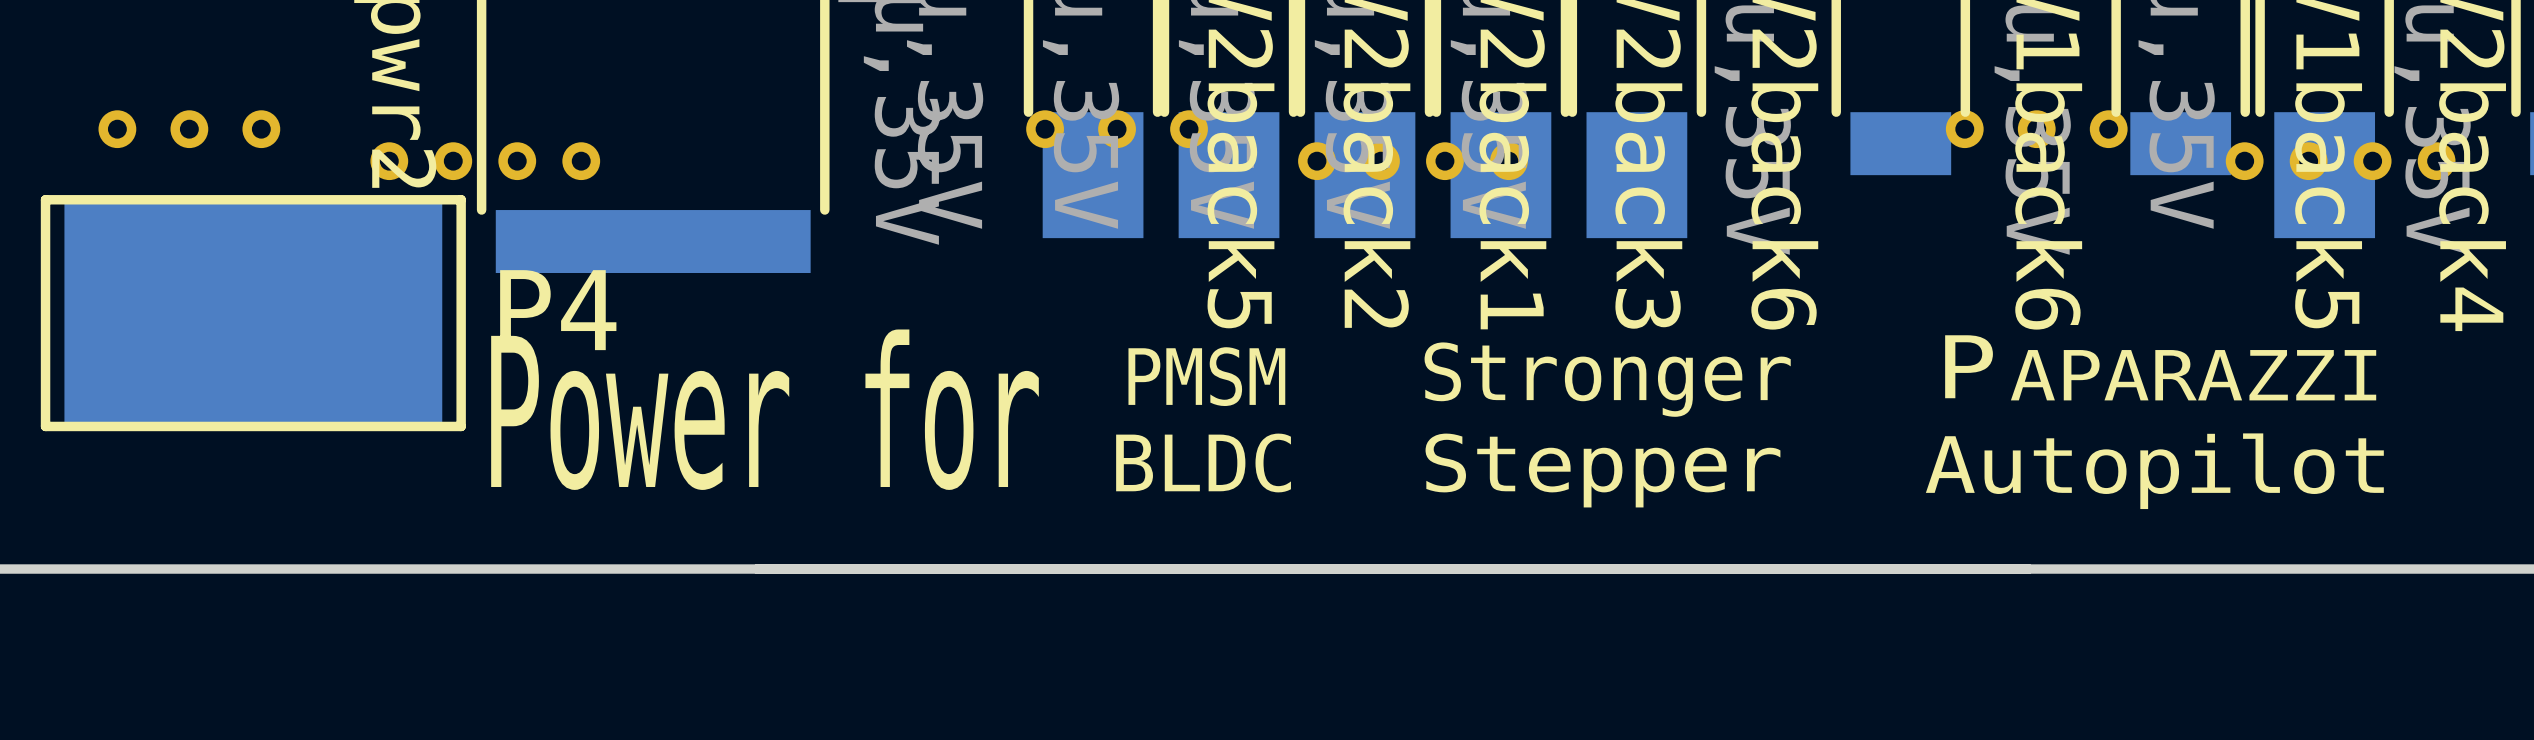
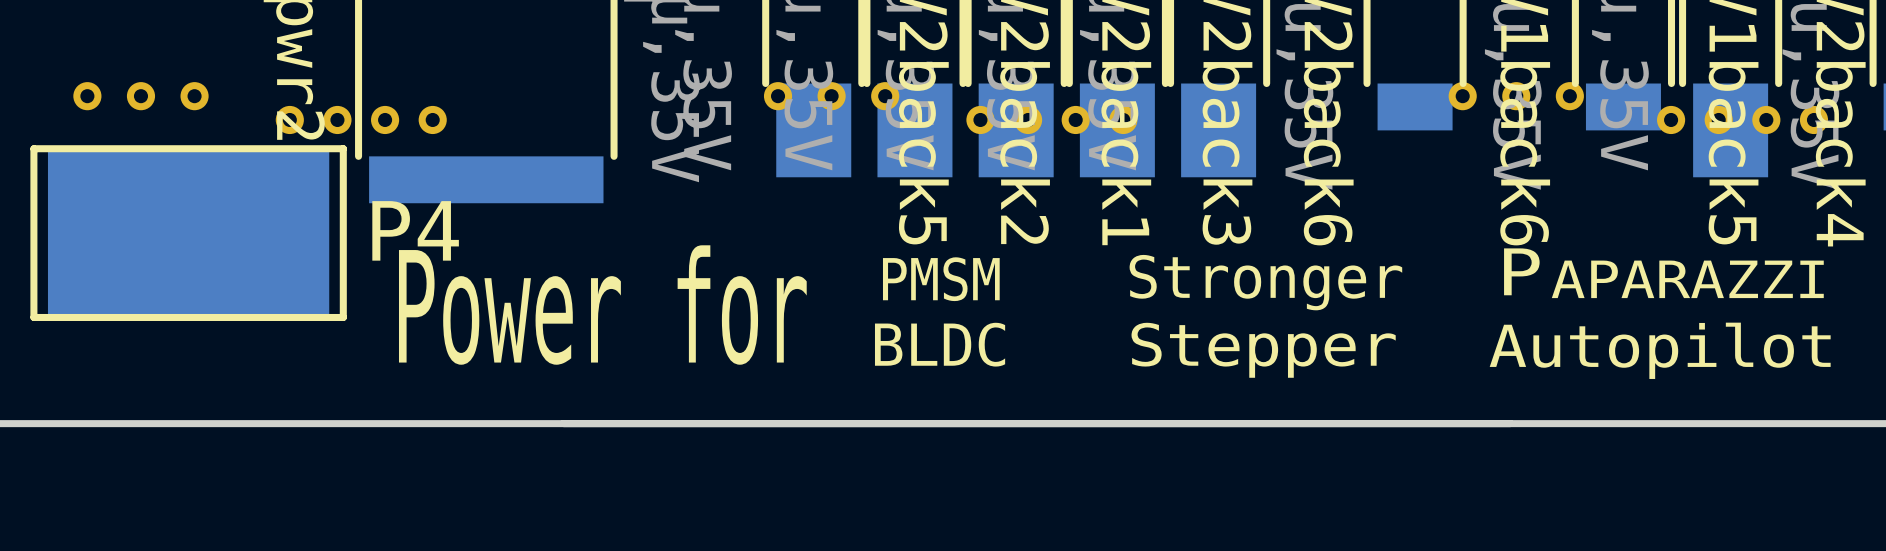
text position: P (1969, 366) -> P (1521, 271)
text position: APARAZZI (2193, 375) -> APARAZZI (1687, 279)
text position: PMSM (1206, 376) -> PMSM (941, 279)
text position: Stronger (1607, 379) -> Stronger (1265, 282)
text position: Power for (764, 409) -> Power for (602, 305)
text position: BLDC (1203, 462) -> BLDC (940, 344)
text position: Stepper (1602, 470) -> Stepper (1263, 350)
text position: Autopilot (2154, 471) -> Autopilot (1660, 350)

